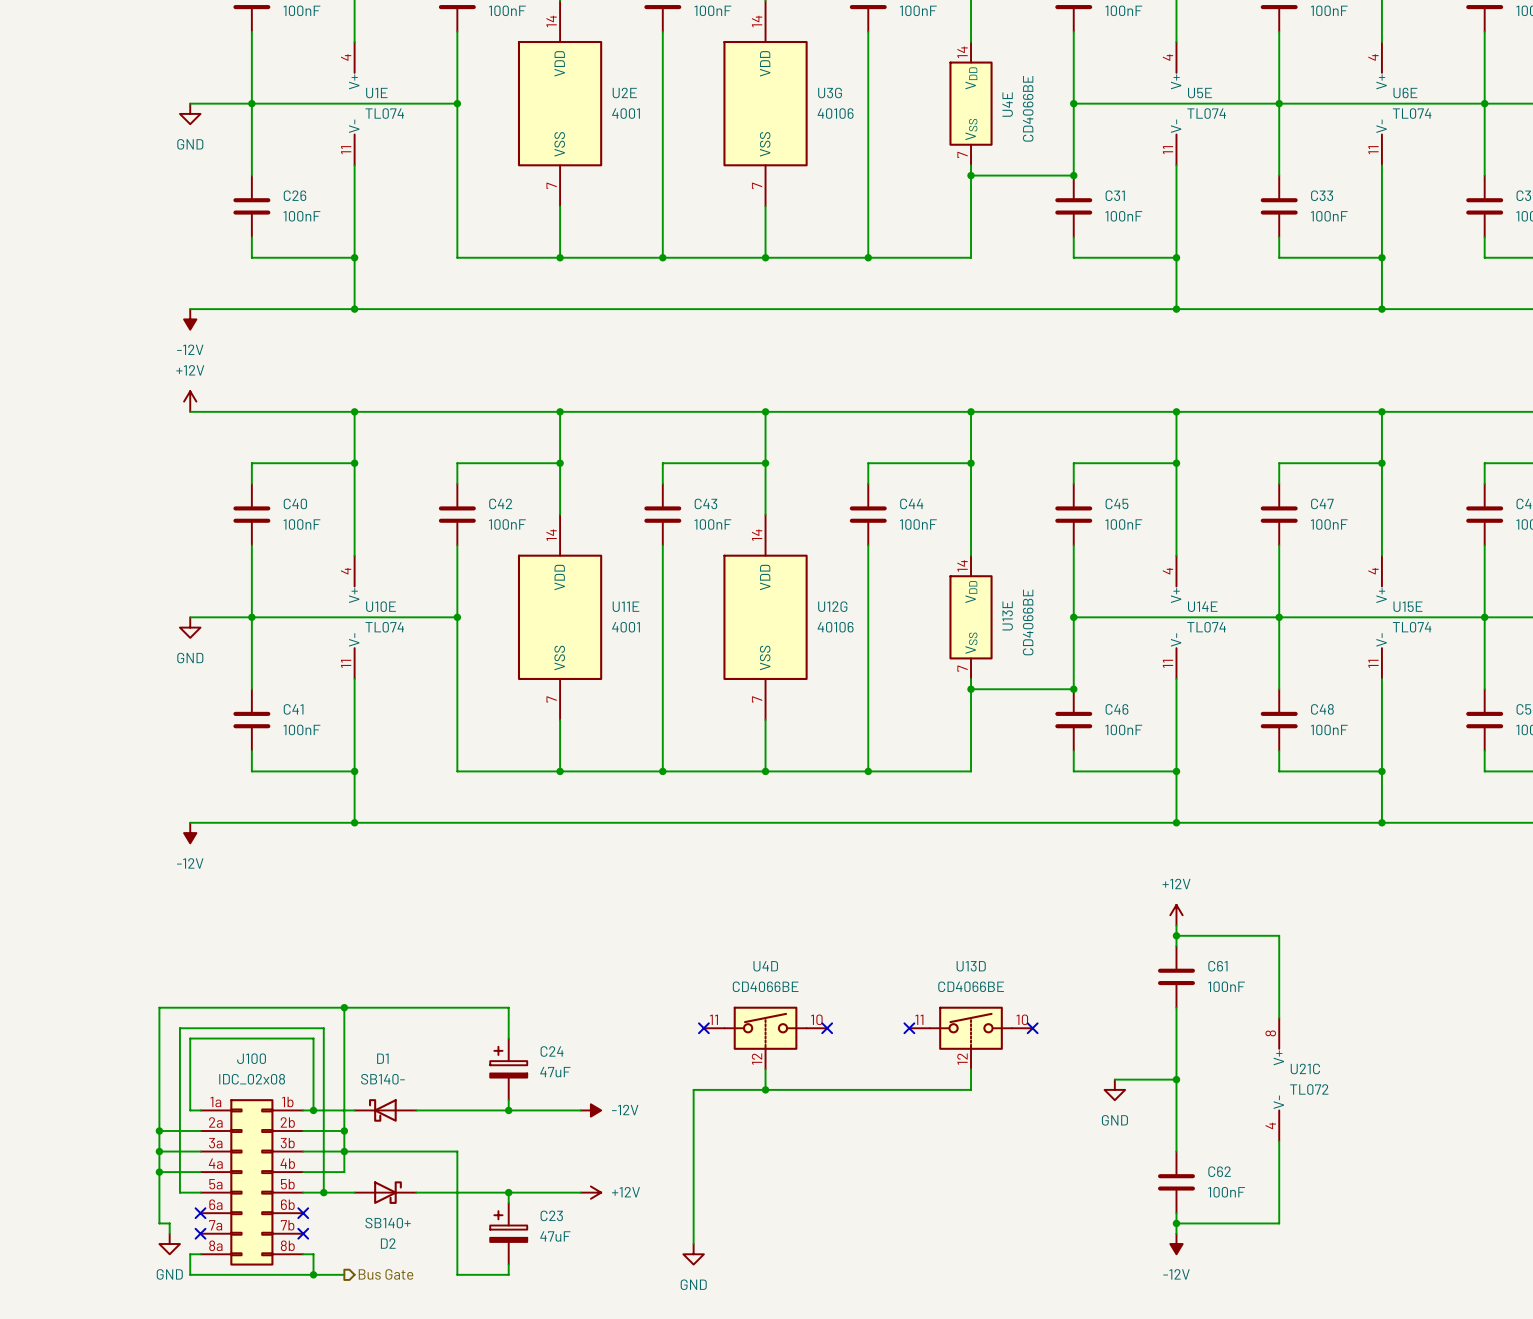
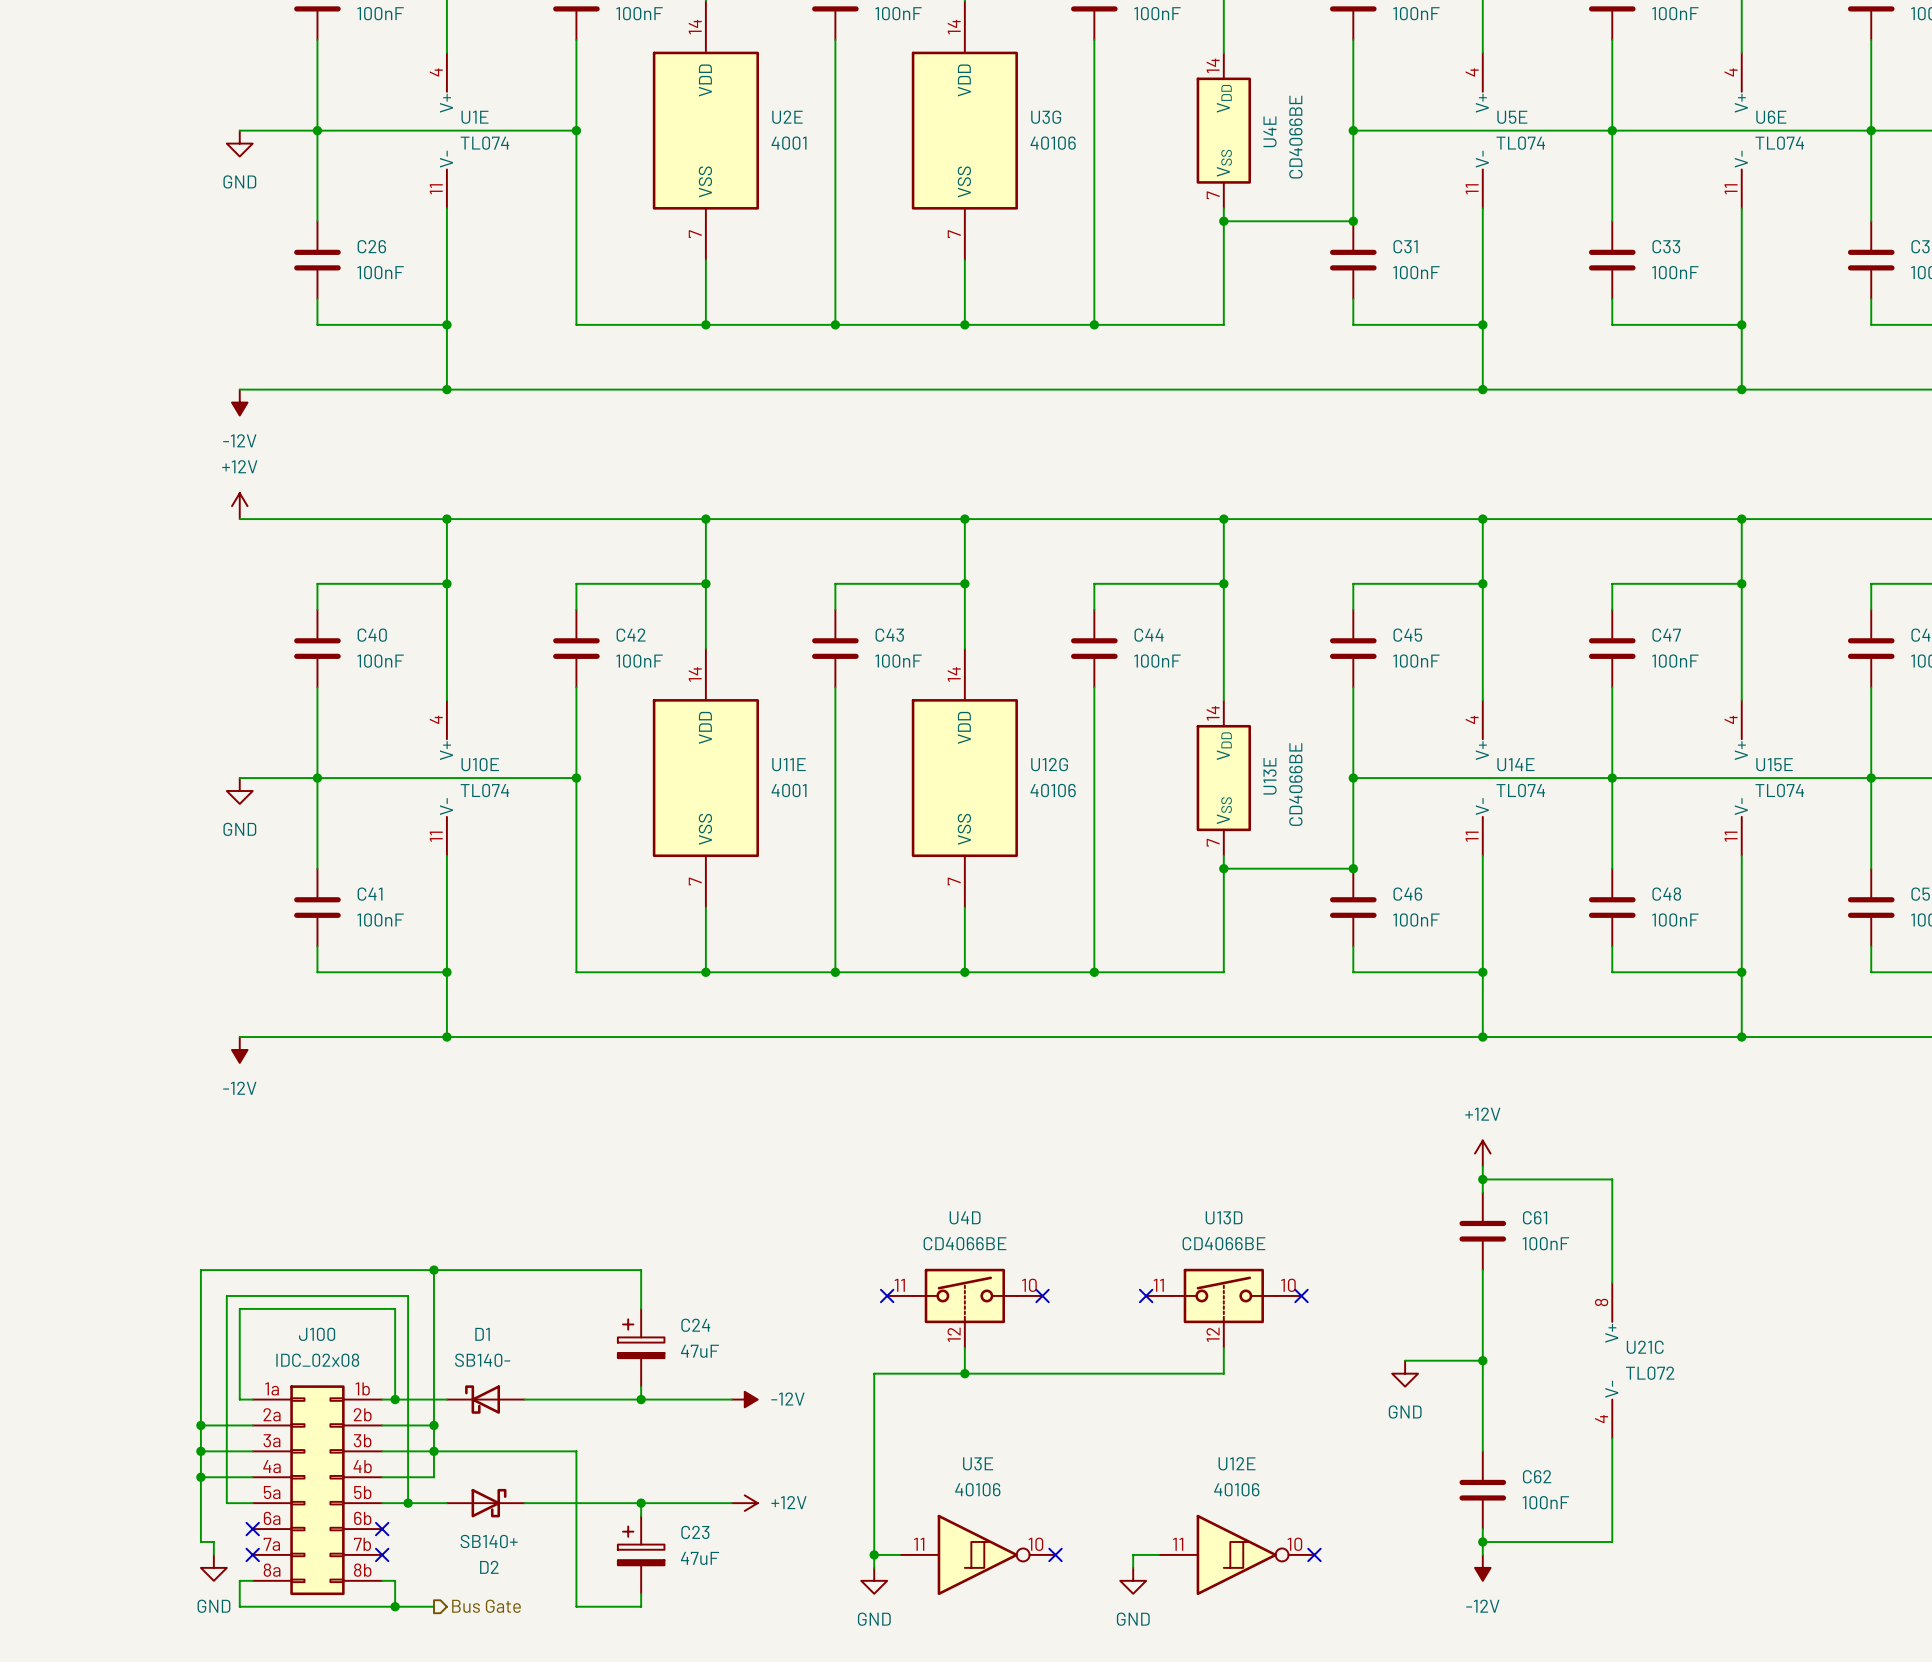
wire: none -> (874, 1554) (900, 1554)
junction: none -> (874, 1554)
U3E: none -> 40106 (977, 1554)
no-connect mark: none -> (1055, 1554)
wire: none -> (1159, 1554) (1133, 1554) (1133, 1567)
U12E: none -> 40106 (1236, 1554)
no-connect mark: none -> (1314, 1554)
power symbol: none -> GND (1133, 1580)

